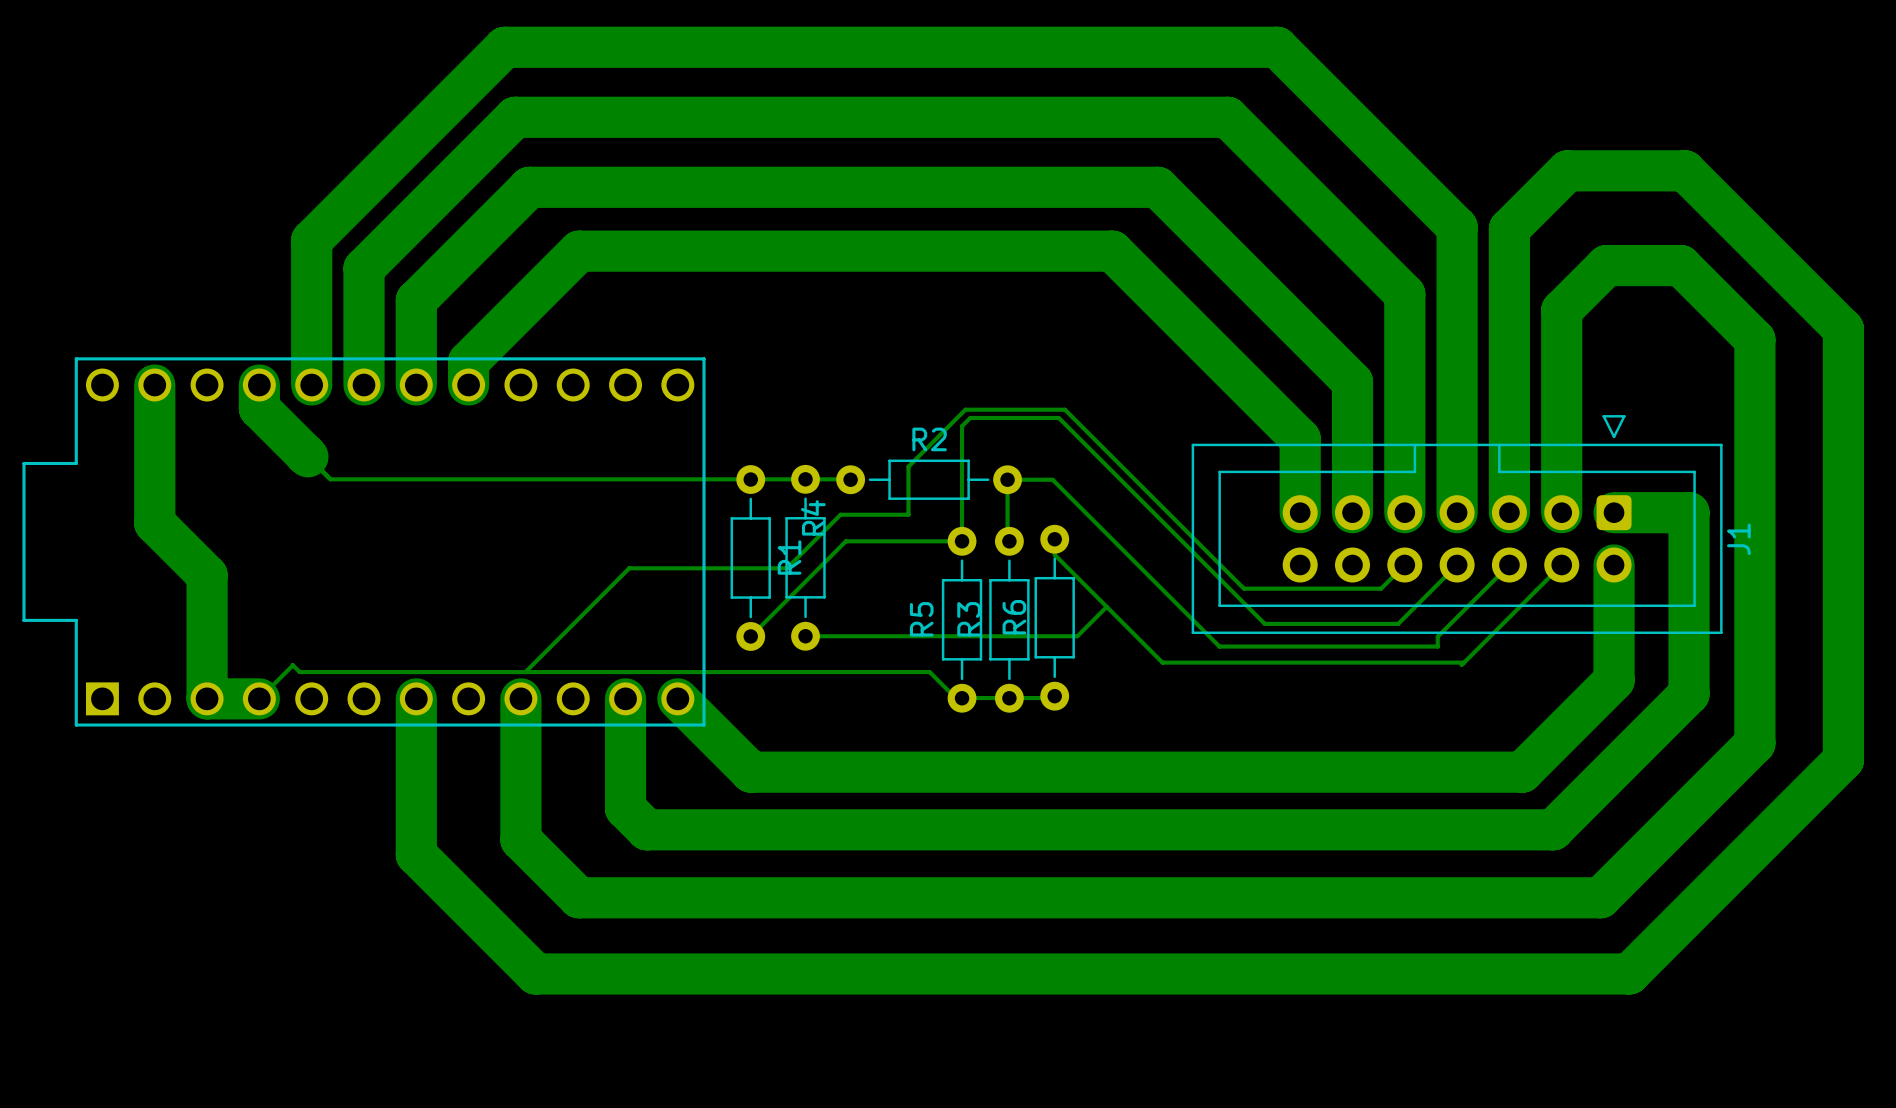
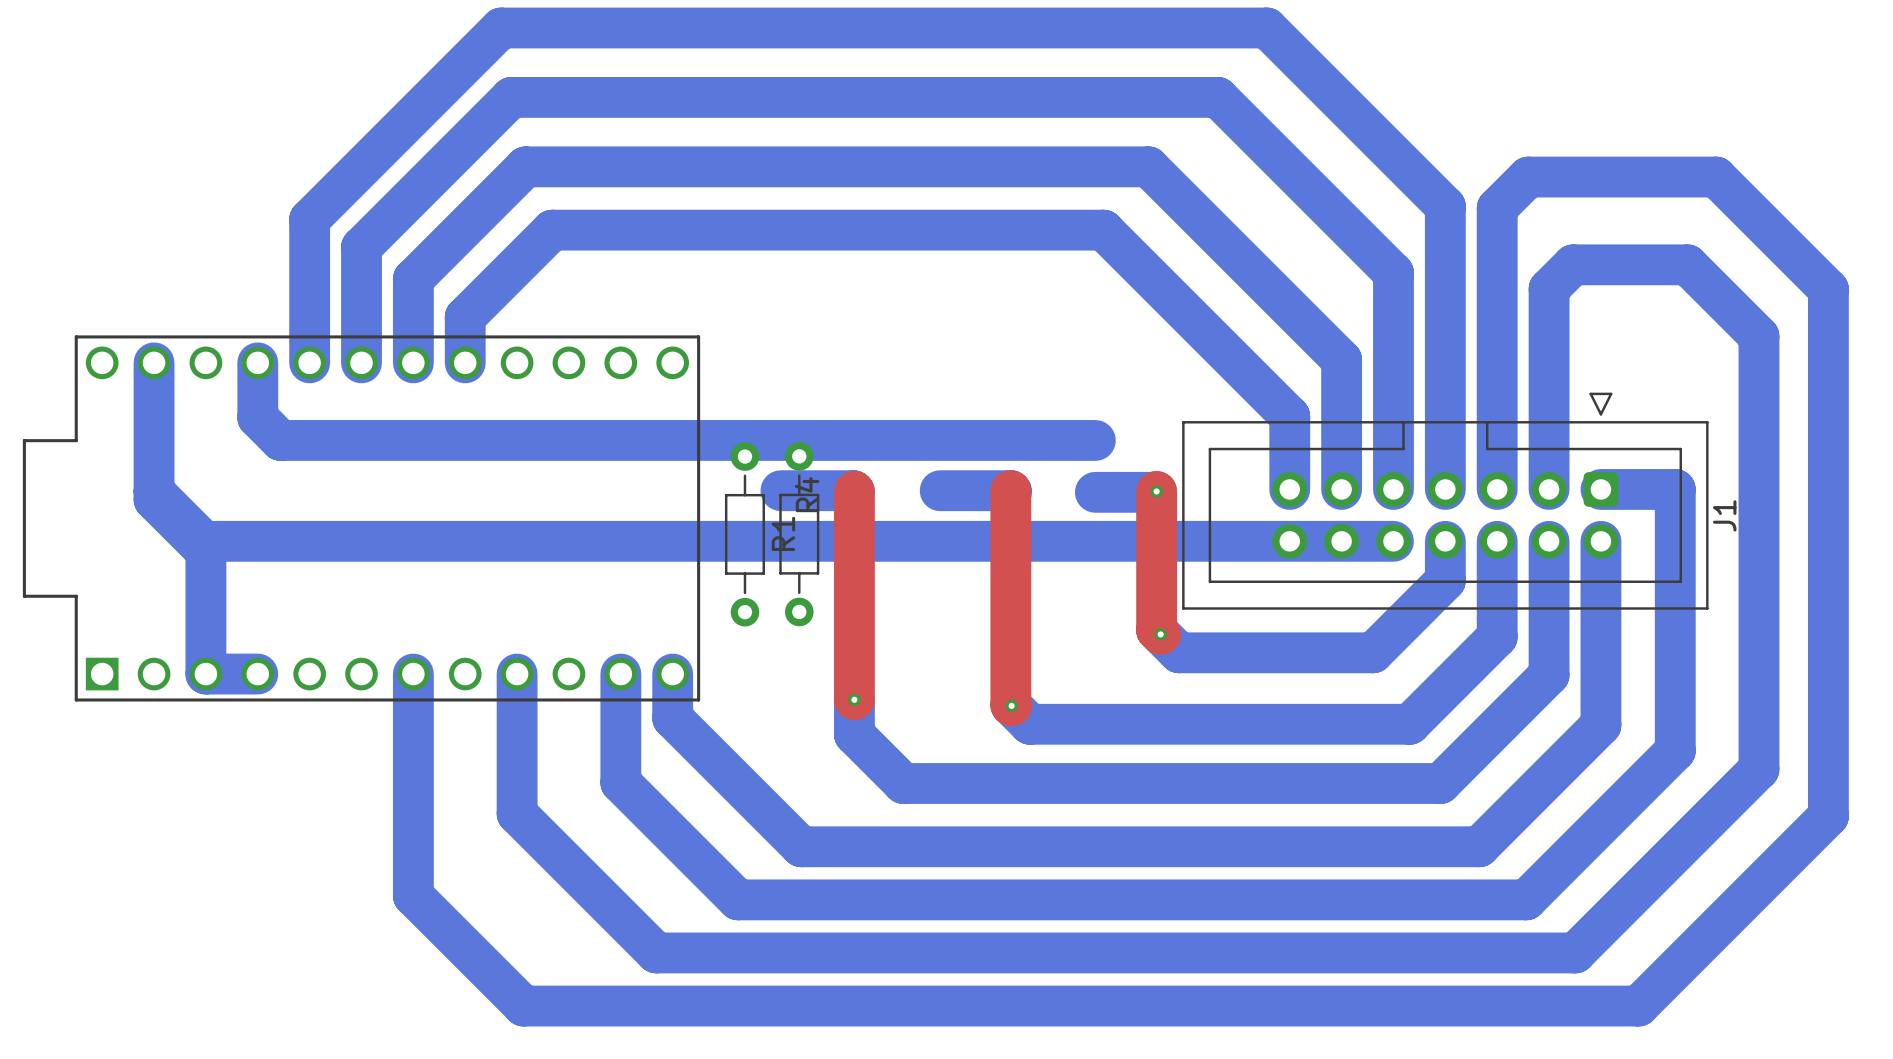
bottom track: (1540, 197) (1567, 170) (1684, 170) (1843, 329) -> (1528, 177) (1716, 177) (1828, 289) (1828, 307)
bottom track: (579, 251) (468, 361) -> (574, 230) (552, 230) (465, 317) (465, 339)
bottom track: (1586, 286) (1606, 265) (1680, 265) (1701, 286) -> (1573, 264) (1687, 264)
bottom track: (1754, 339) (1754, 743) (1600, 897) (579, 897) -> (1740, 317) (1758, 336) (1758, 769) (1575, 952) (656, 952) (574, 871)
bottom track: (259, 408) (307, 456) -> (257, 385) (257, 417) (280, 440) (1095, 440)
bottom track: (305, 454) (330, 479) (854, 479) -> none
R2: (929, 479) -> none
bottom track: none -> (780, 490) (854, 491)
bottom track: none -> (940, 490) (1011, 491)
top track: none -> (1010, 490) (1011, 705)
top track: none -> (854, 491) (854, 699)
bottom track: none -> (1156, 491) (1095, 492)
top track: none -> (1156, 491) (1156, 630) (1160, 634)
via: none -> (1156, 491)
bottom track: (1054, 539) (1054, 554) (1162, 662) (1464, 662) -> none
bottom track: (1009, 541) (1007, 539) (1007, 479) (1052, 479) (1219, 646) (1437, 646) (1437, 636) (1509, 565) -> (1011, 705) (1030, 724) (1409, 724) (1497, 636) (1497, 541)
bottom track: (1404, 565) (1381, 588) (1243, 588) (1065, 409) (965, 409) (908, 466) (908, 514) (840, 514) (786, 568) (629, 568) (525, 672) -> (1393, 541) (216, 541) (205, 551) (205, 543) (154, 491)
bottom track: (1457, 565) (1398, 623) (1264, 623) (1058, 417) (970, 417) (962, 426) (962, 541) (845, 541) (750, 636) -> (1445, 541) (1445, 580) (1373, 652) (1179, 652) (1160, 634)
bottom track: (1561, 565) (1461, 665) -> (1549, 541) (1549, 674) (1440, 783) (903, 783) (854, 734) (854, 699)
bottom track: (1106, 606) (1077, 636) (805, 636) (805, 625) -> none
R6: (1054, 617) -> none
R5: (962, 619) -> none
R3: (1009, 619) -> none
via: none -> (1160, 634)
bottom track: (292, 665) (299, 672) (929, 672) (955, 698) (1052, 698) -> none
bottom track: (292, 665) (259, 698) -> none
bottom track: (1614, 680) (1522, 772) (751, 772) (677, 698) -> (1600, 655) (1600, 725) (1479, 846) (801, 846) (672, 718) (672, 674)
bottom track: (1689, 693) (1553, 829) (646, 829) -> (1675, 669) (1675, 750) (1526, 899) (738, 899) (642, 803)
via: none -> (854, 699)
via: none -> (1011, 705)
bottom track: (1843, 759) (1629, 973) (535, 973) (416, 854) -> (1828, 734) (1828, 816) (1638, 1006) (523, 1006) (413, 895) (413, 828)

